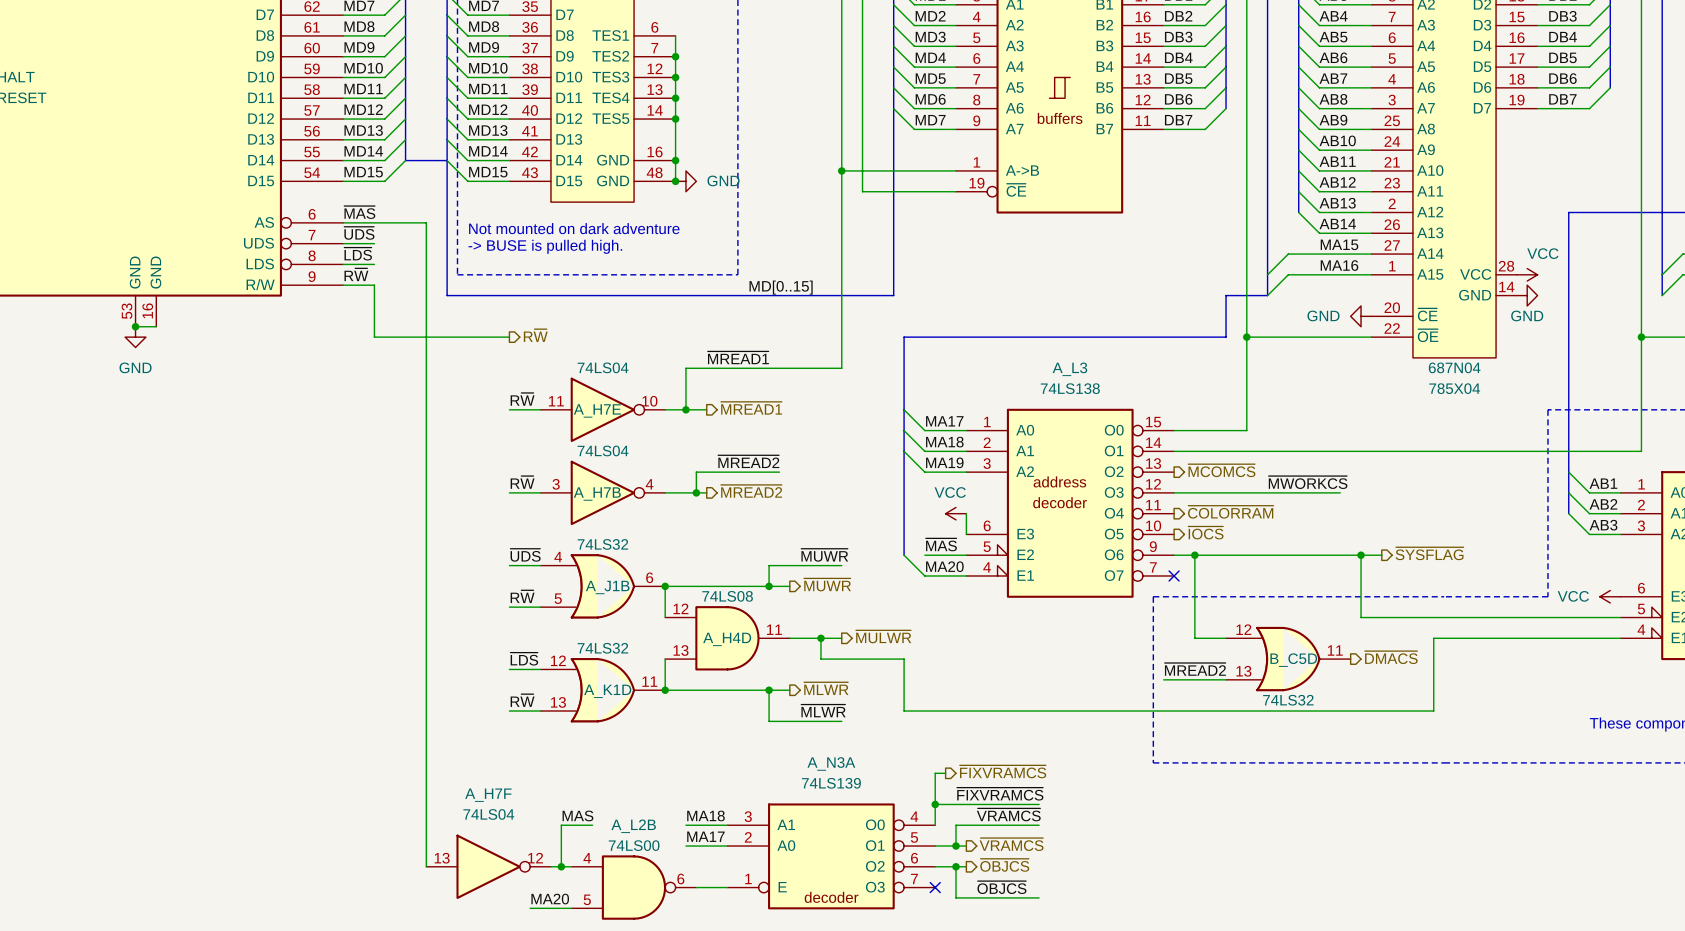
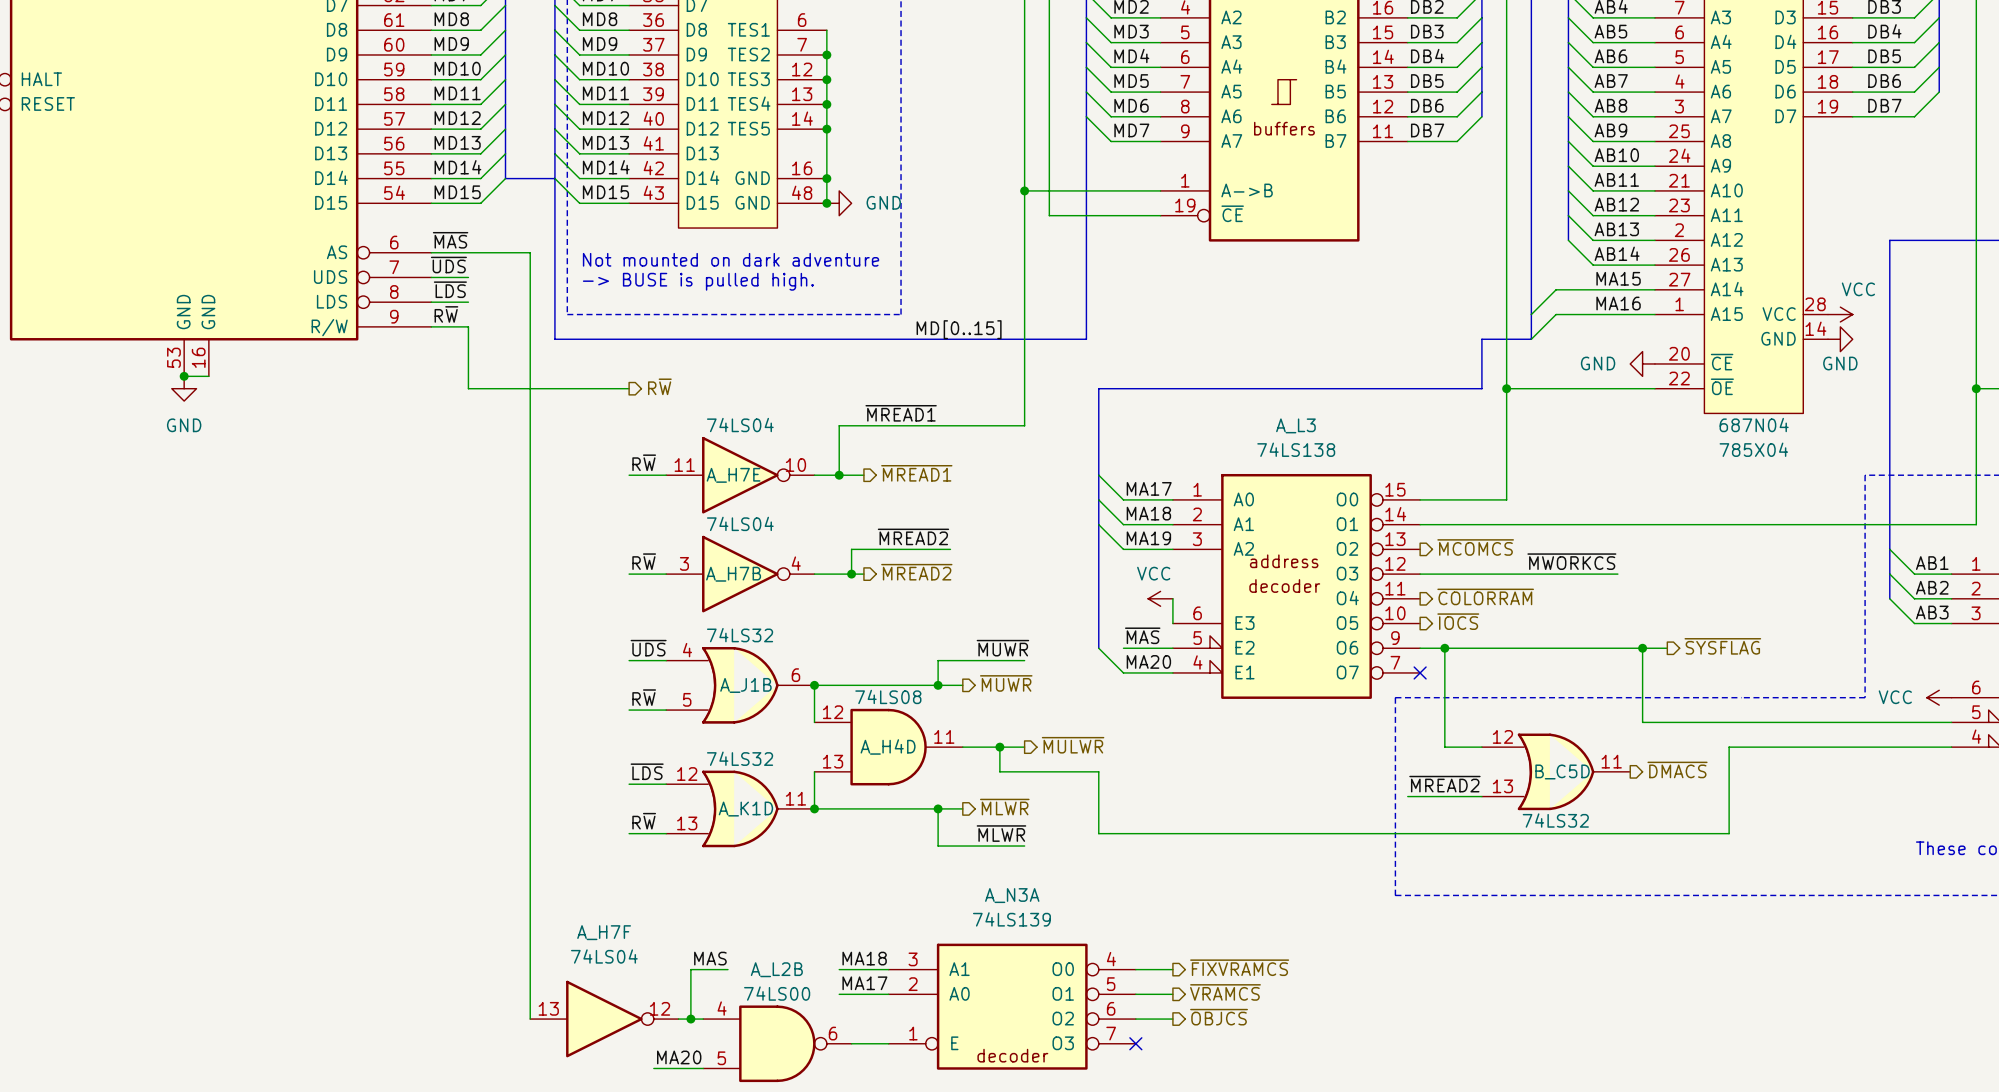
label position: ~{UDS} (359, 233) -> ~{UDS} (448, 265)
label position: ~{LDS} (358, 254) -> ~{LDS} (450, 289)
label position: ~{MWORKCS} (1307, 482) -> ~{MWORKCS} (1571, 561)
hierarchical label position: ~{FIXVRAMCS} (1003, 771) -> ~{FIXVRAMCS} (1239, 967)
wire: (945, 773) (935, 773) (935, 825) -> none
label: ~{FIXVRAMCS} (1000, 794) -> none
wire: (935, 804) (1039, 804) -> none
junction: (935, 804) -> none
label: ~{VRAMCS} (1008, 814) -> none
wire: (955, 825) (955, 846) -> (1160, 969) (1135, 969)
wire: (966, 825) (1039, 825) -> none
junction: (955, 846) -> none
wire: (955, 866) (955, 897) (1039, 897) -> none
junction: (955, 866) -> none
label: ~{OBJCS} (1001, 887) -> none

